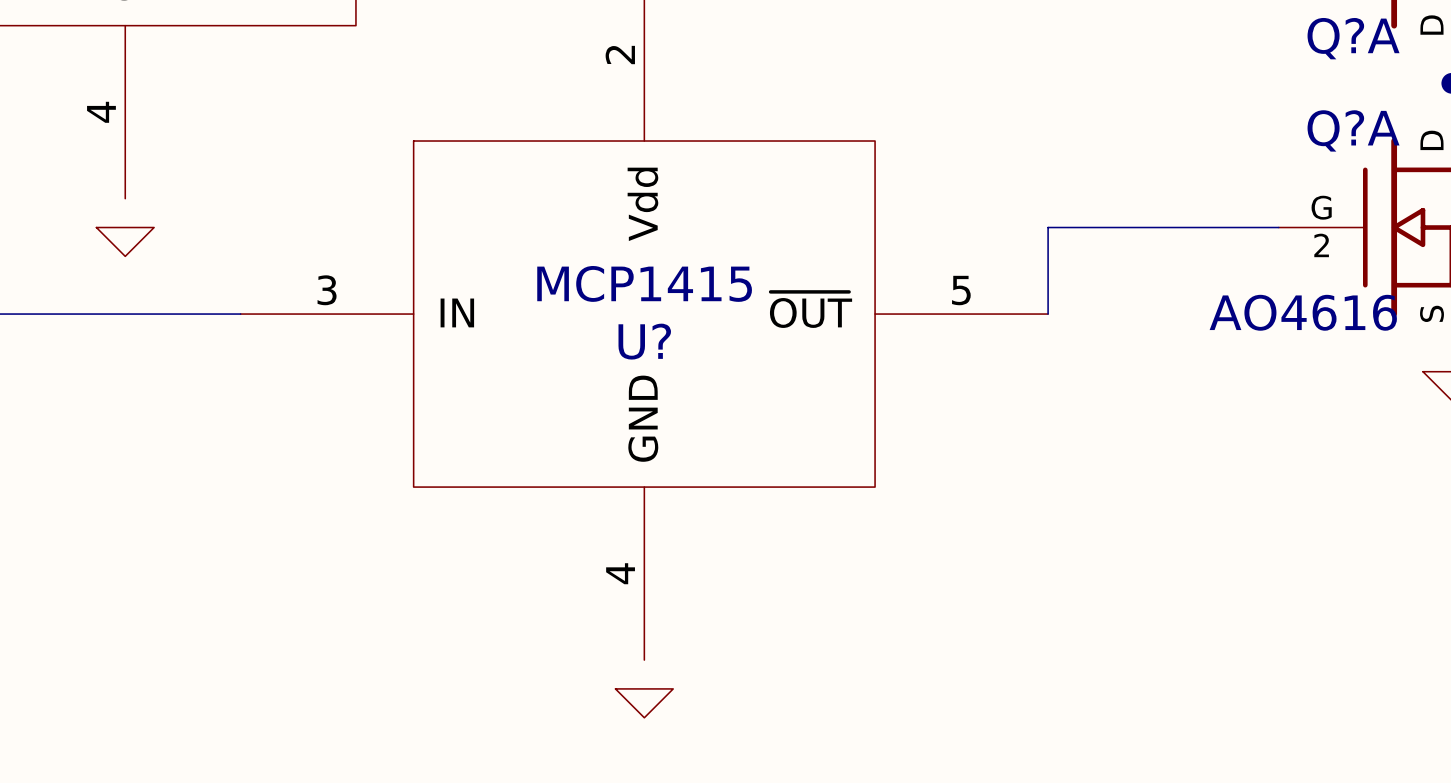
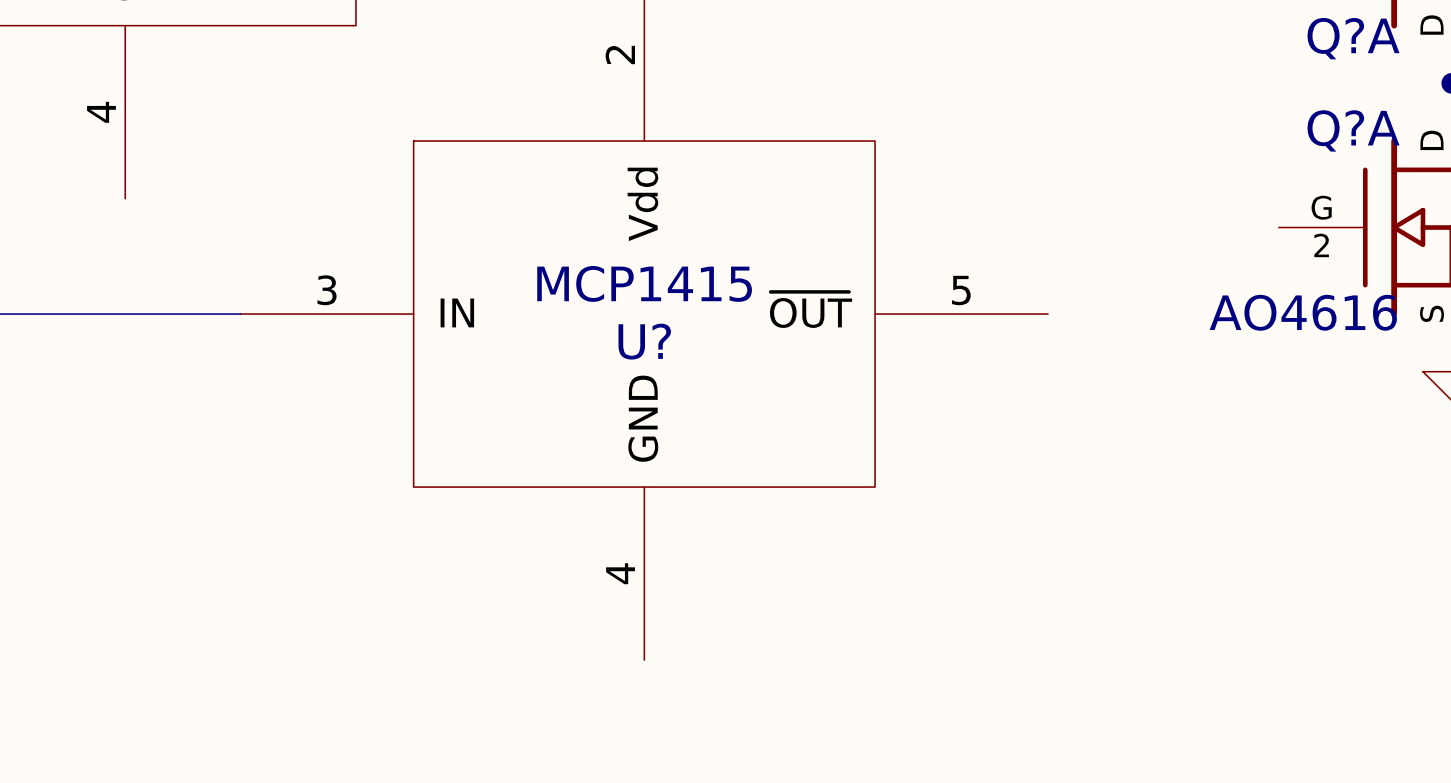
wire: (1278, 227) (1048, 227) (1048, 314) -> none
power symbol: (125, 241) -> none
power symbol: (644, 703) -> none

